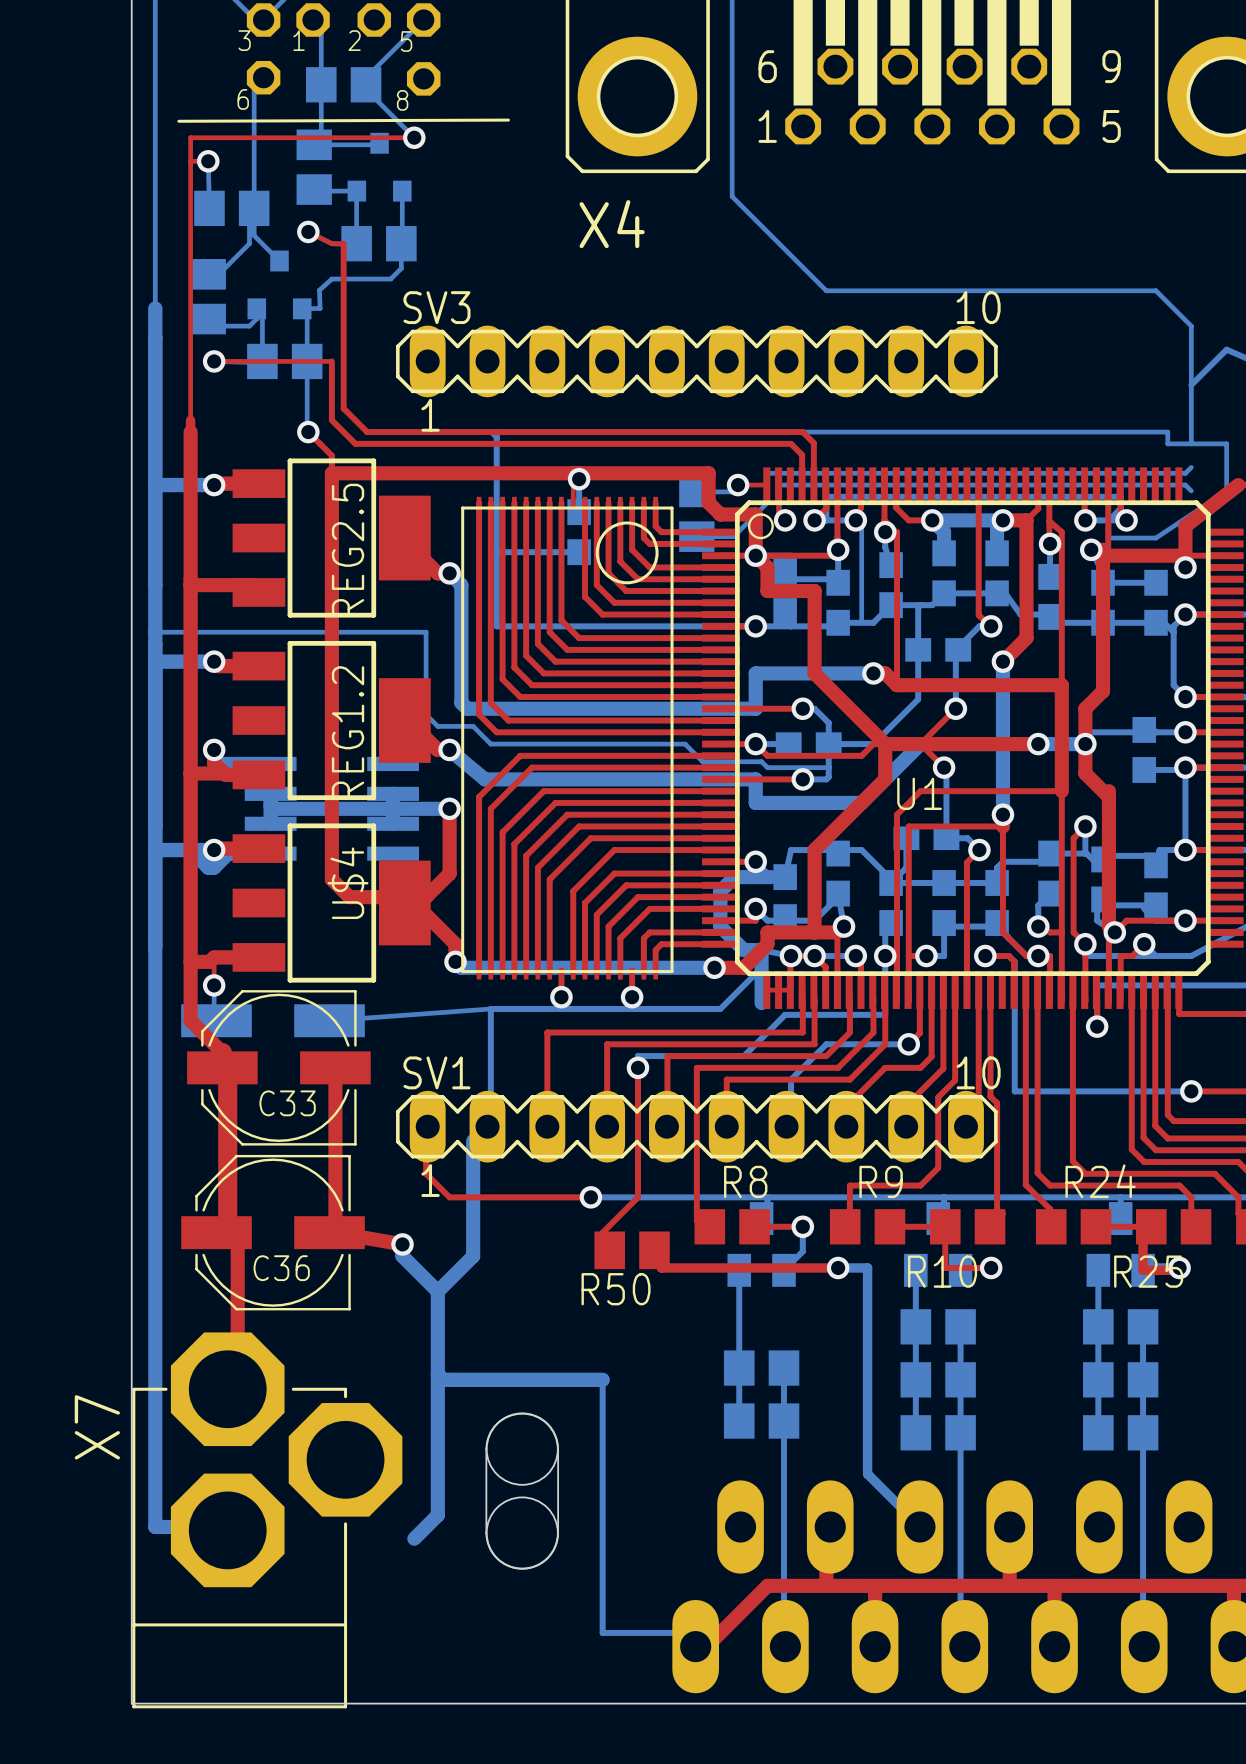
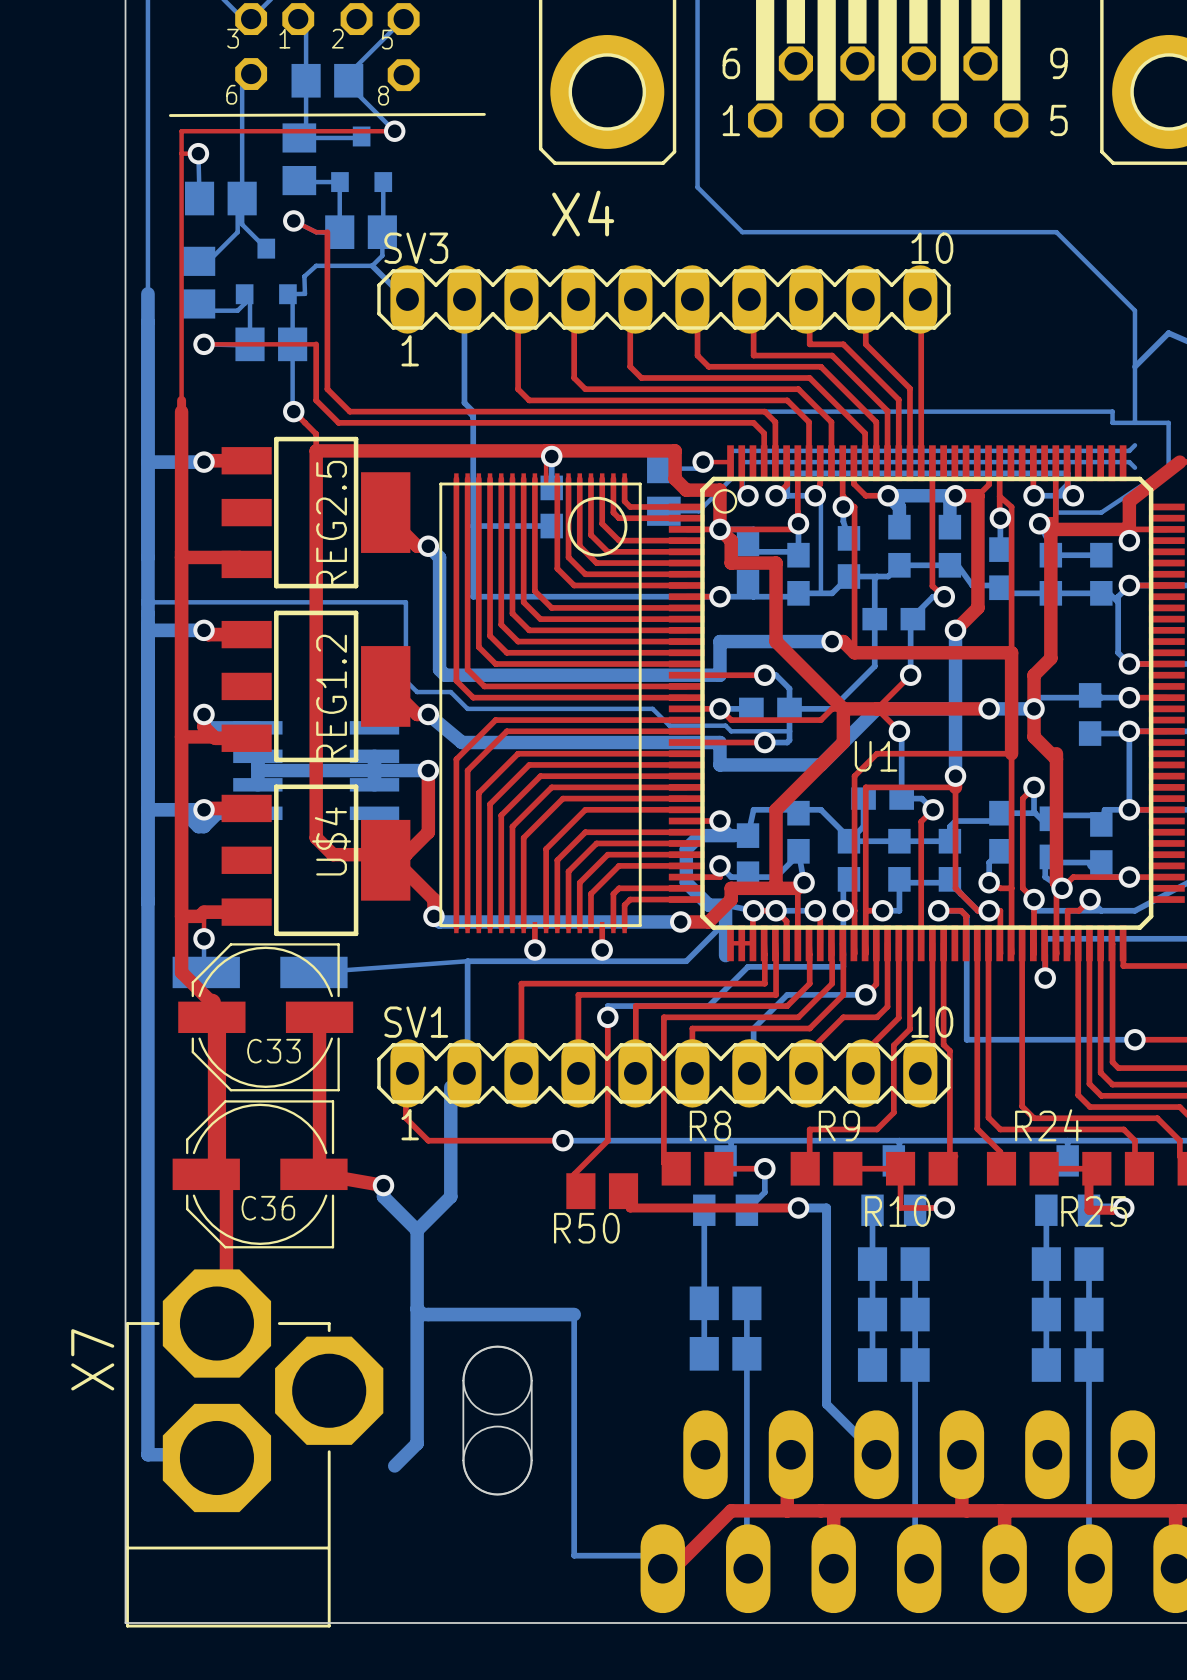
bottom track: (779, 243) (826, 290) (1156, 290) -> (742, 232) (1056, 232) (1101, 277)
bottom track: none -> (372, 265) (407, 299)
bottom track: none -> (464, 299) (464, 402) (473, 411)
top track: none -> (518, 299) (518, 389) (529, 400) (787, 400) (809, 422) (809, 463)
top track: none -> (578, 299) (574, 303) (574, 377) (585, 389) (798, 389) (831, 422) (831, 463)
top track: none -> (635, 299) (630, 304) (630, 366) (641, 377) (809, 377) (865, 433) (865, 463)
top track: none -> (692, 299) (697, 304) (697, 355) (708, 366) (820, 366) (876, 422) (876, 463)
top track: none -> (749, 299) (753, 303) (753, 355) (832, 355) (887, 410) (887, 463)
top track: none -> (806, 299) (809, 302) (809, 344) (843, 344) (898, 399) (898, 463)
top track: none -> (863, 299) (865, 301) (865, 344) (909, 388) (909, 463)
top track: none -> (920, 299) (921, 463)
SV3 position: (696, 361) -> (663, 299)

